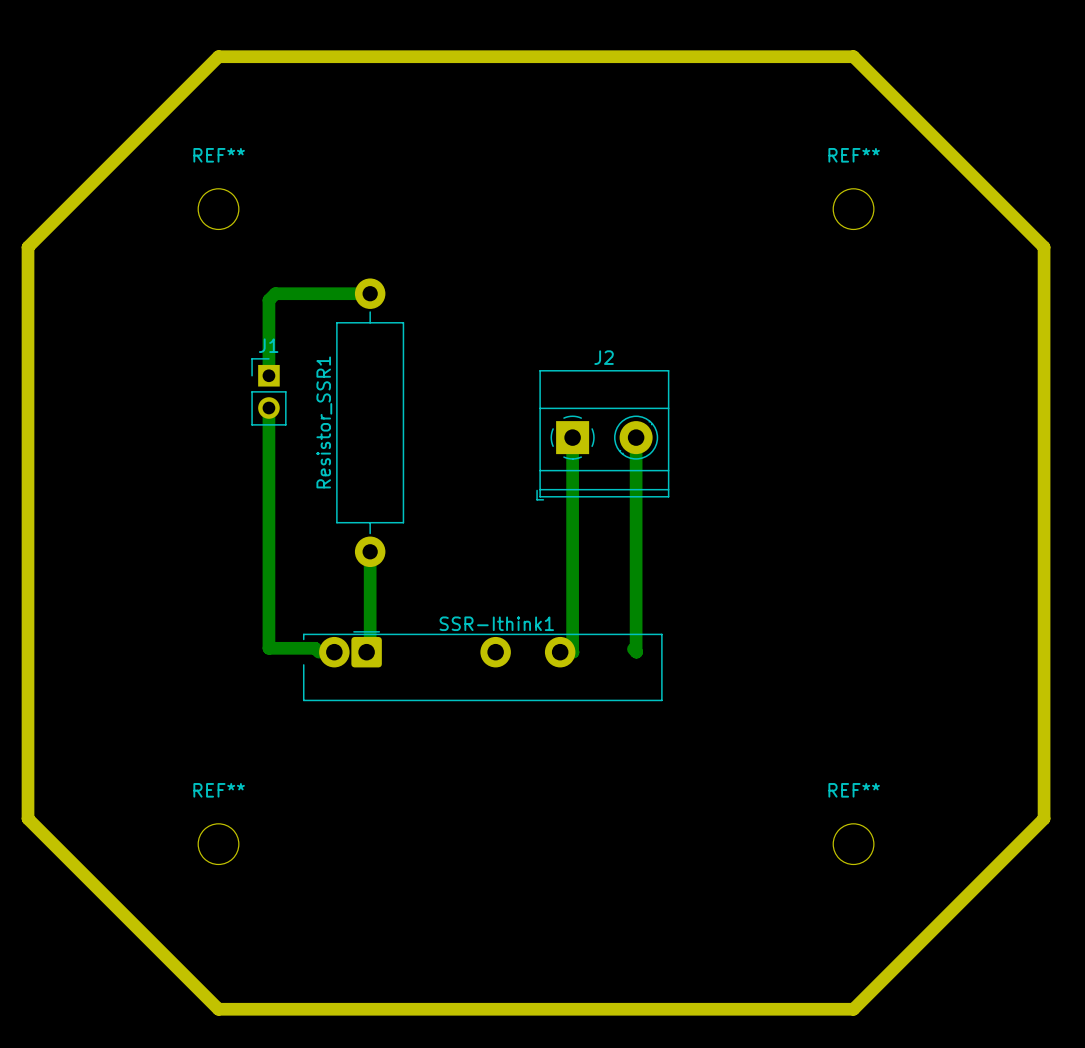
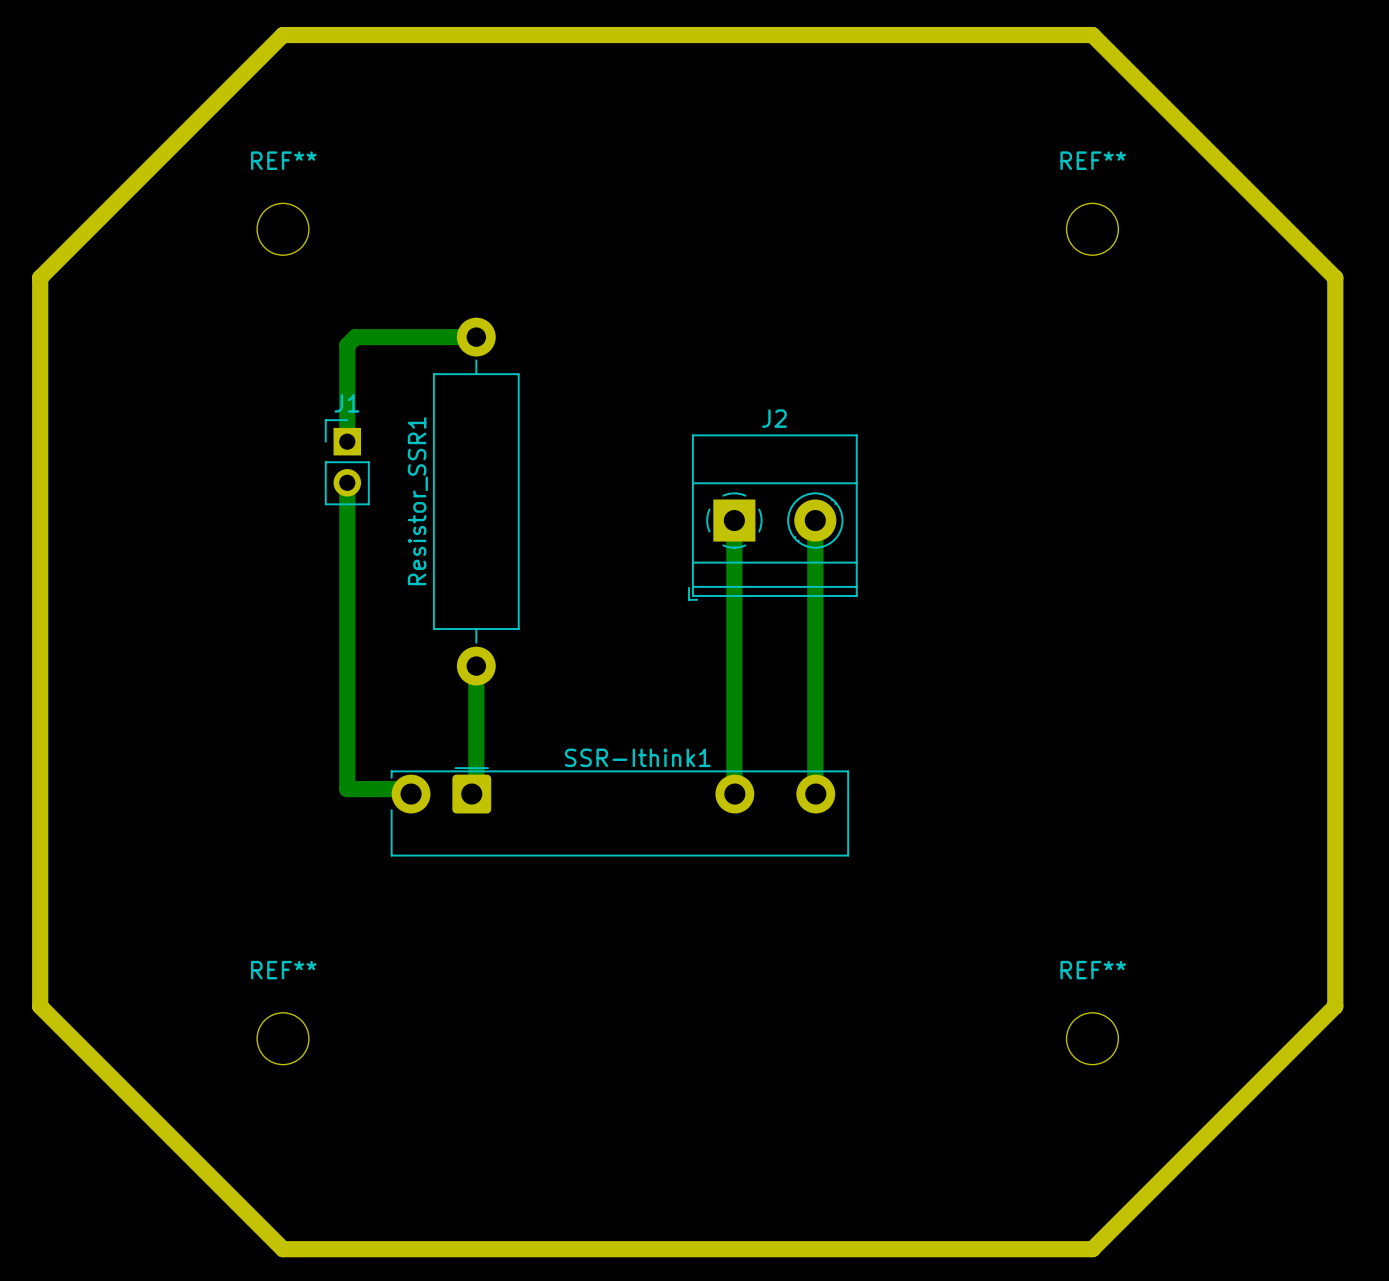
SSR-Ithink1 footprint: [302, 631, 663, 702] -> [390, 767, 850, 857]

